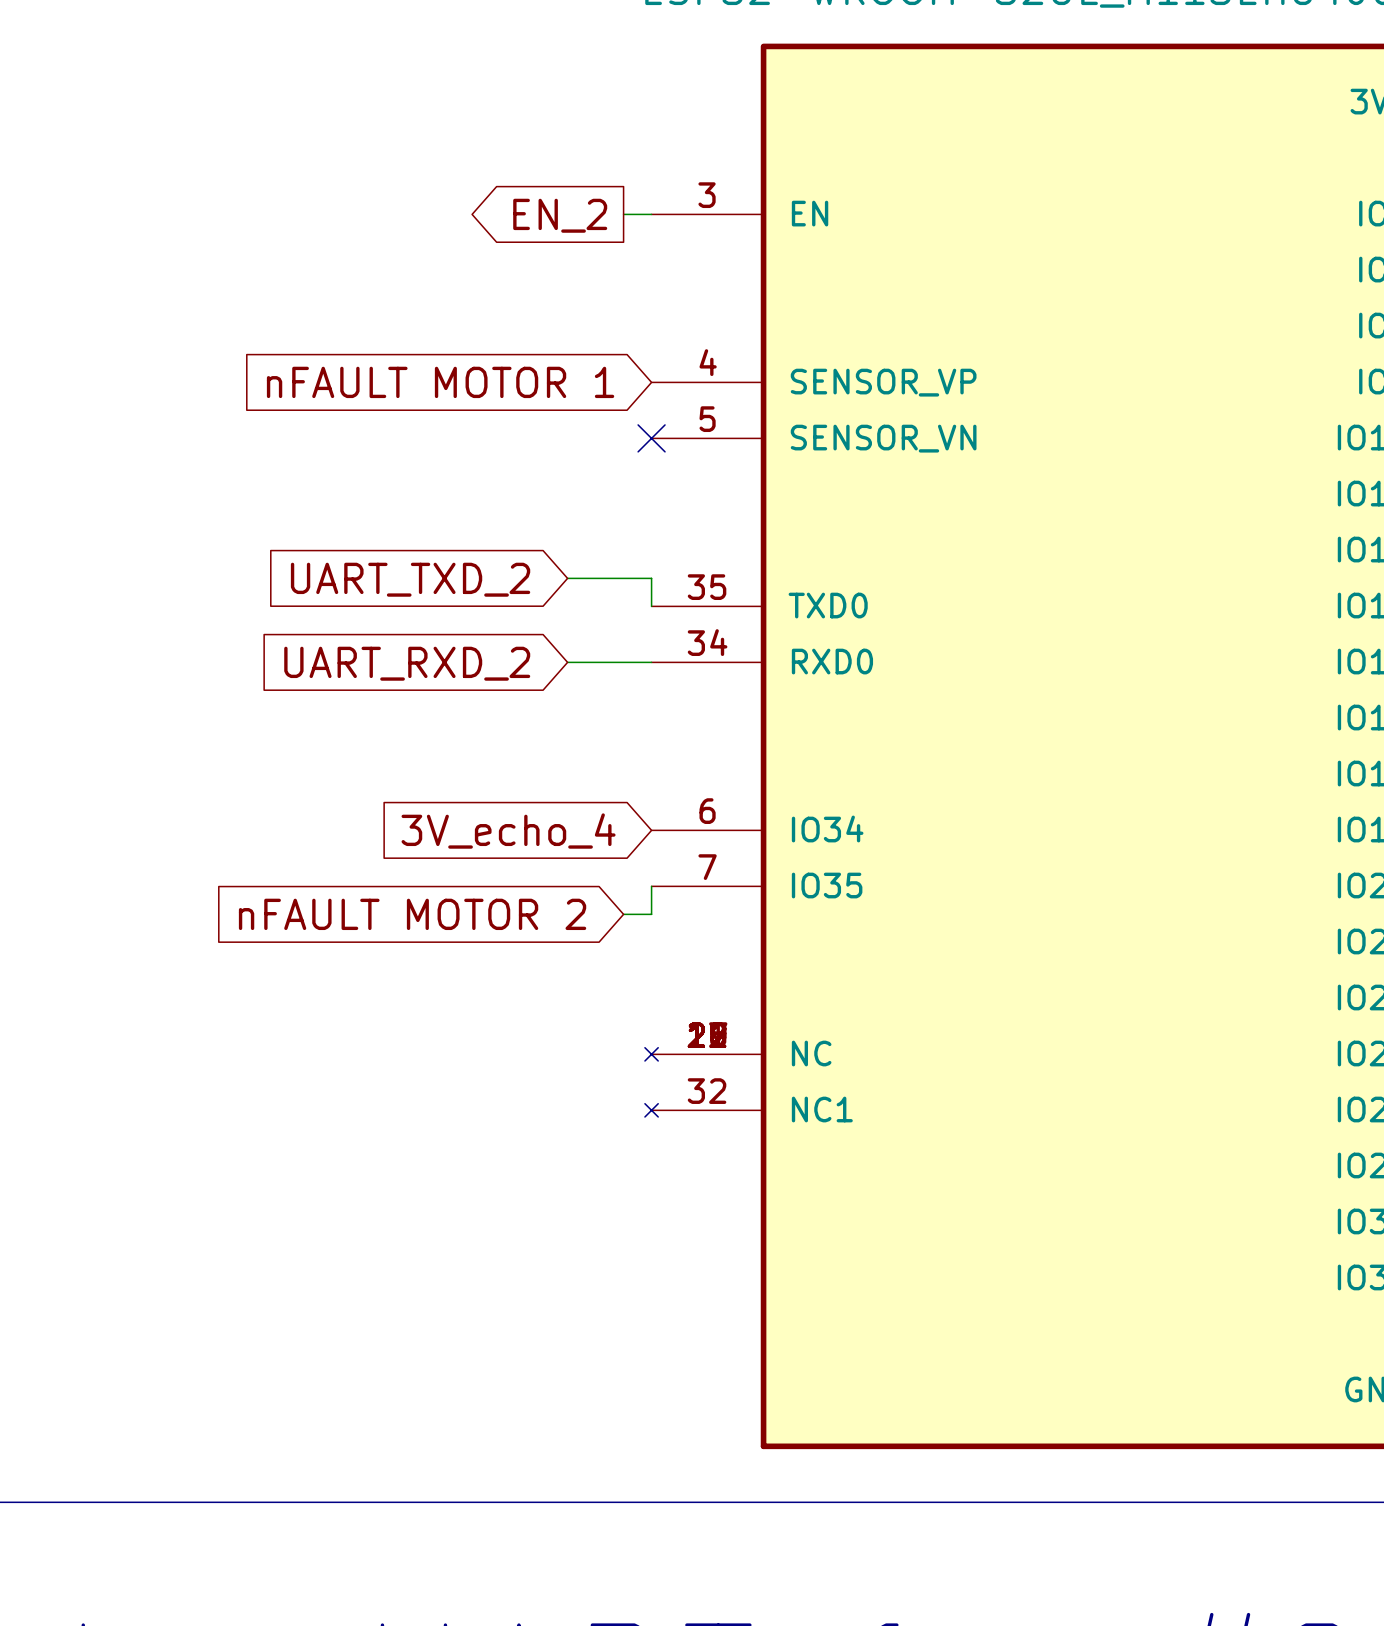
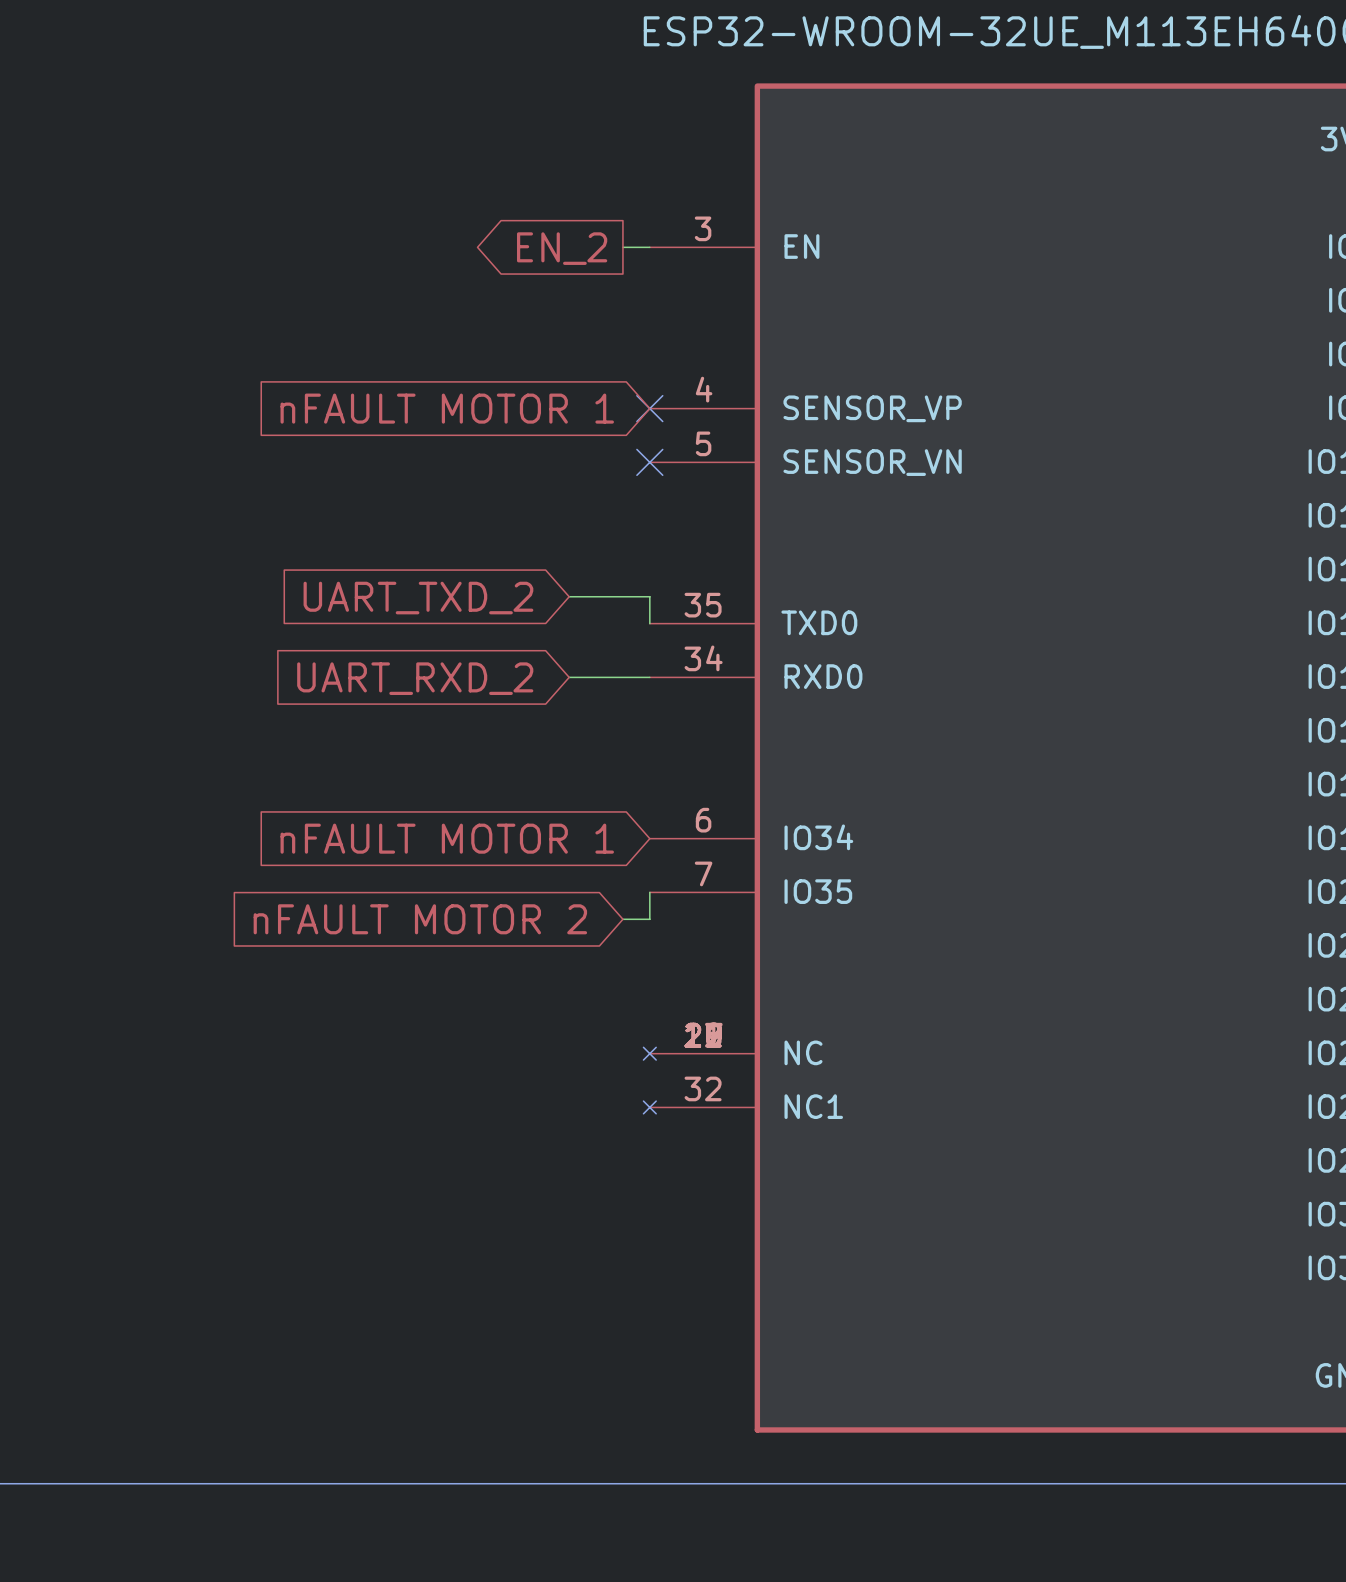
no-connect mark: none -> (649, 408)
global label: 3V_echo_4 (508, 831) -> nFAULT MOTOR 1 (447, 838)

